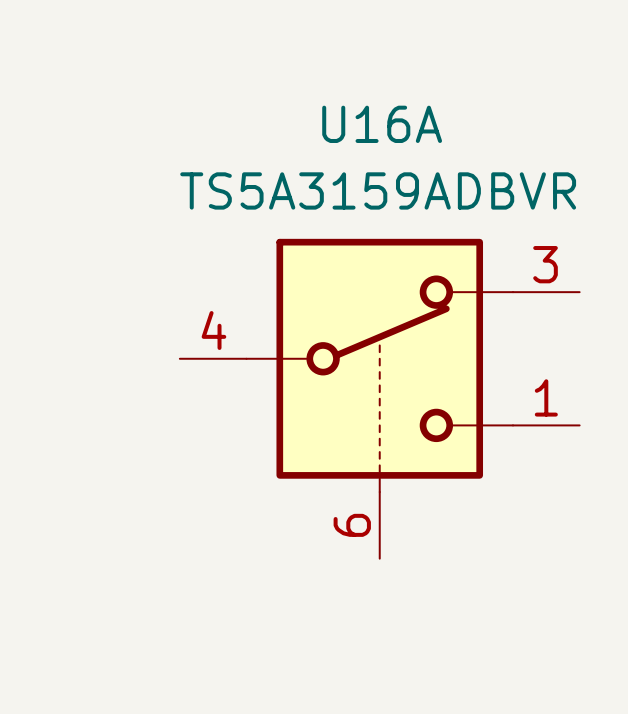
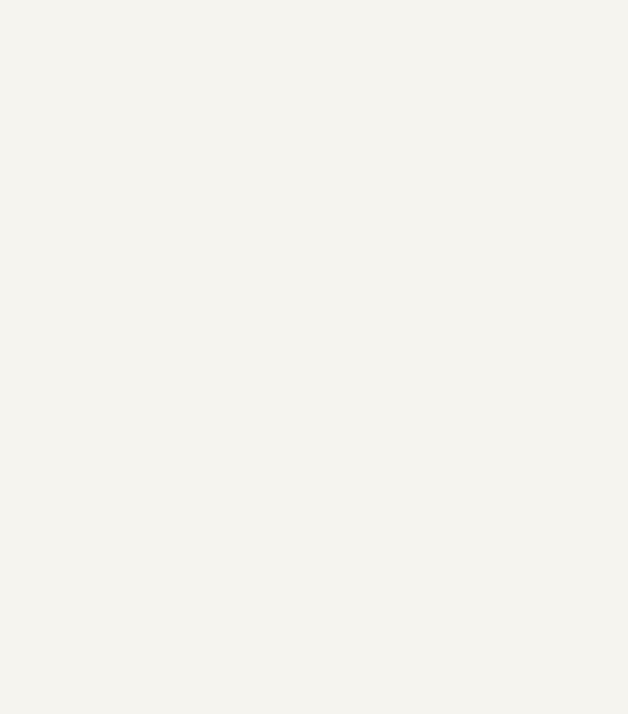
U16A: TS5A3159ADBVR (379, 398) -> none

